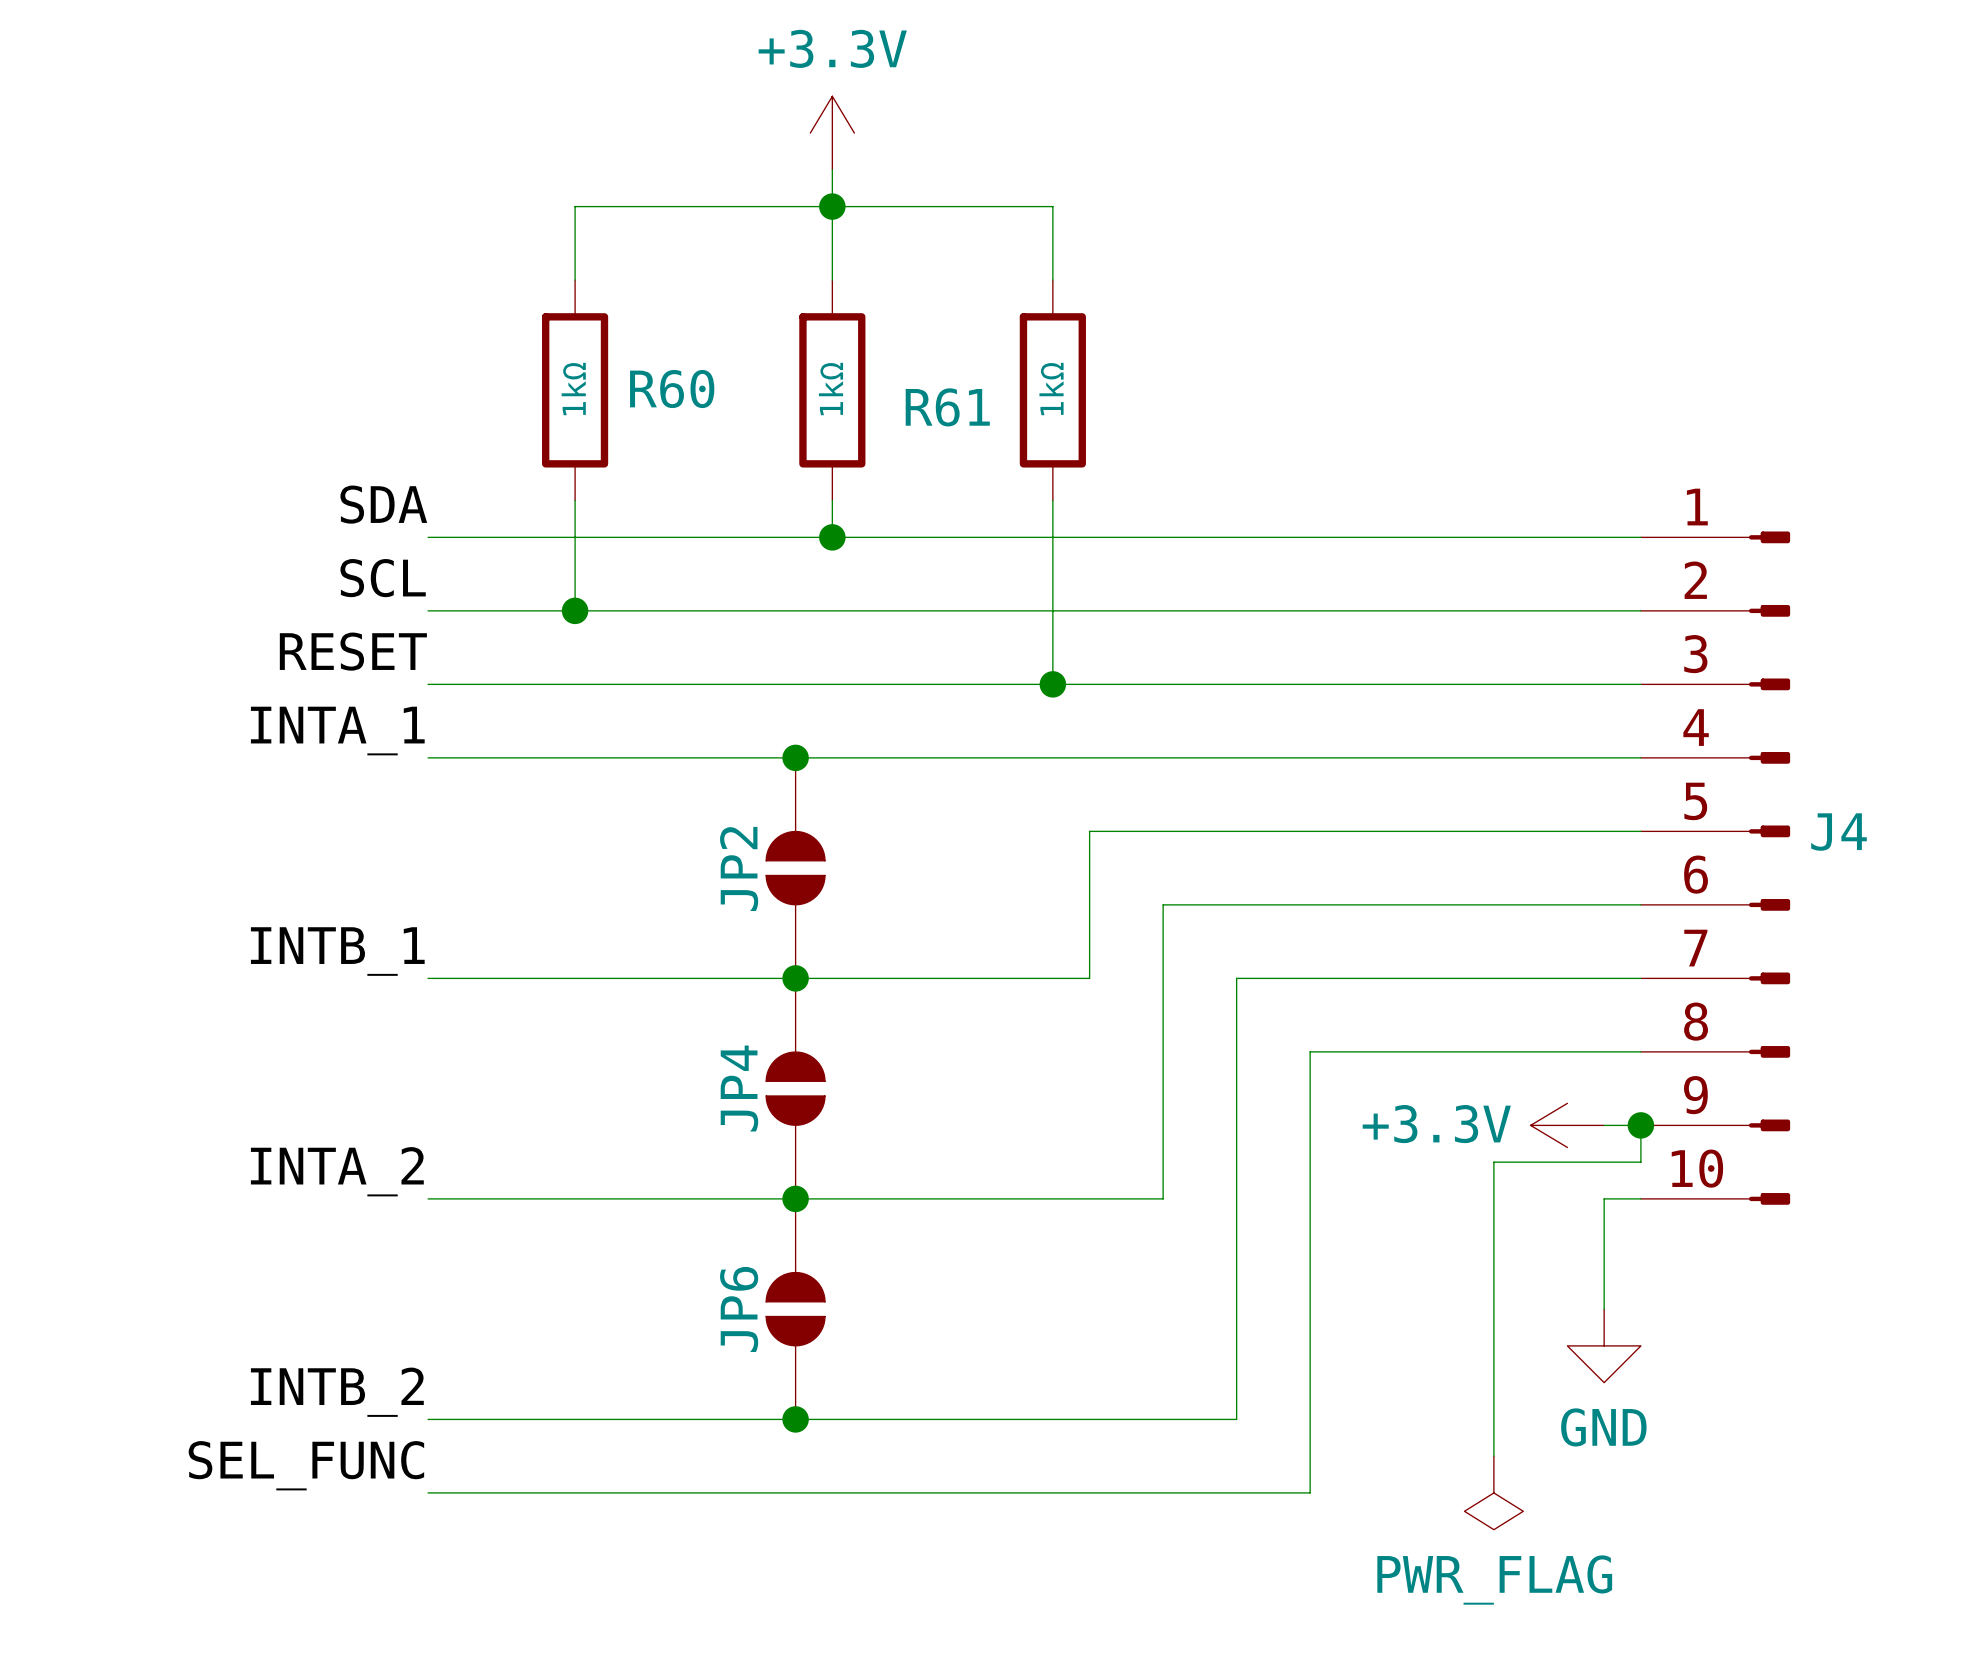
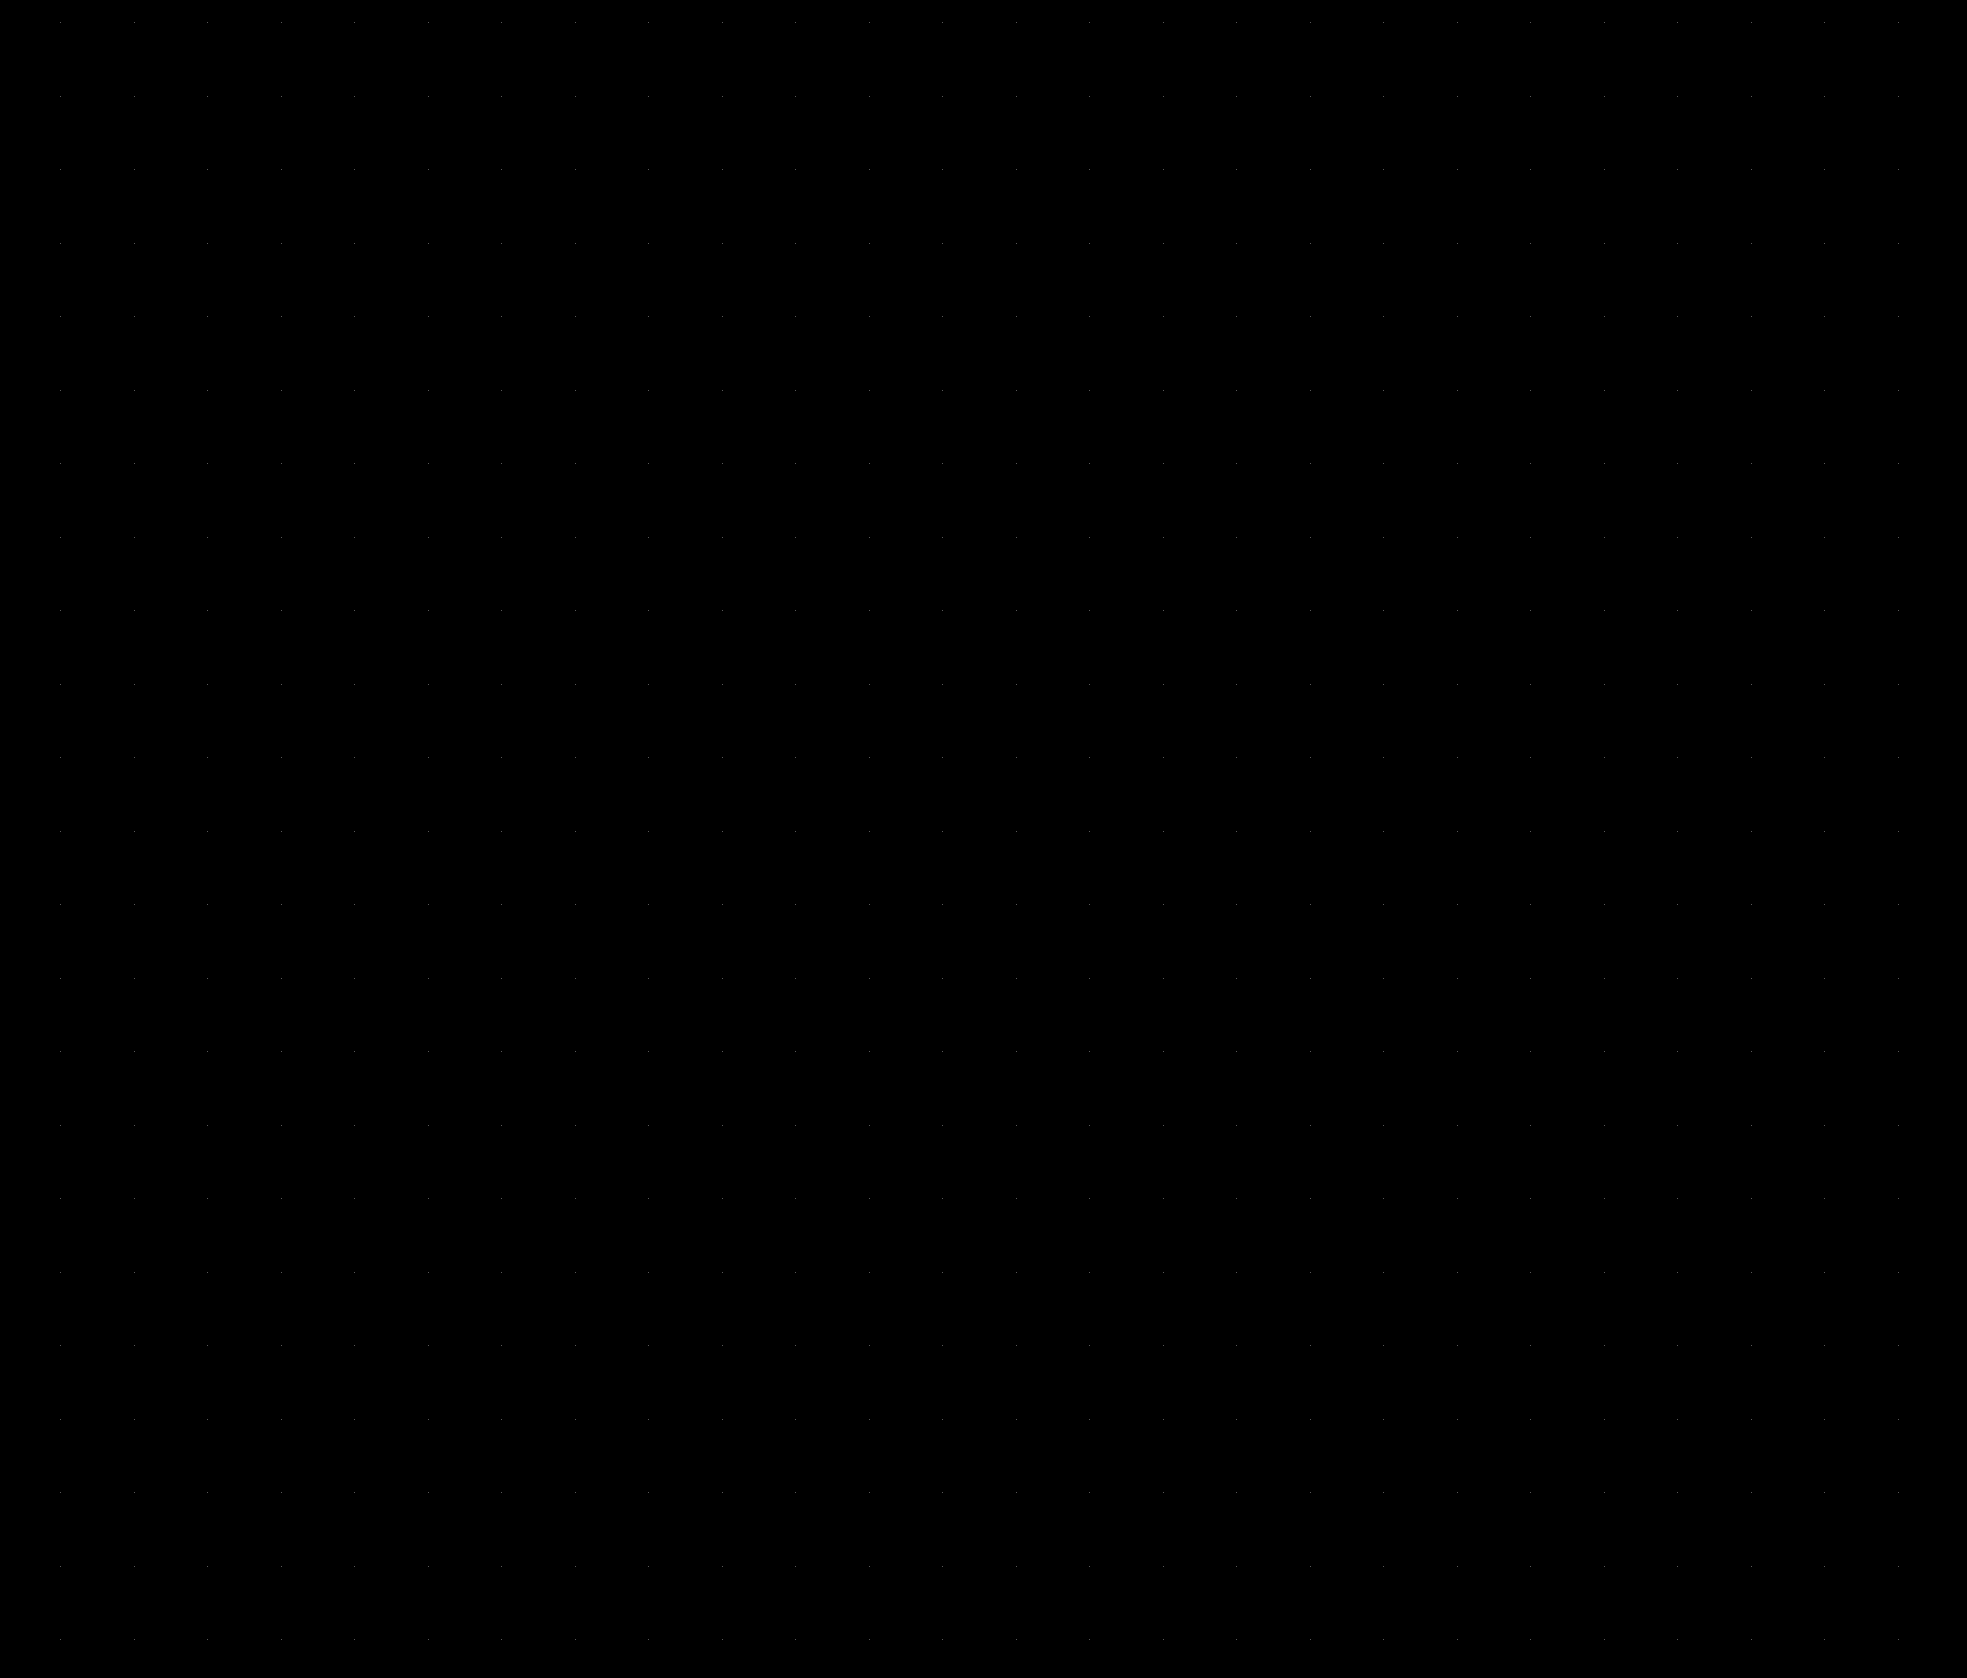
power symbol: +3.3V (832, 133) -> none
wire: (832, 169) (832, 280) -> none
junction: (832, 206) -> none
wire: (575, 280) (575, 206) (1052, 206) (1052, 280) -> none
R60: 1kΩ (575, 390) -> none
R61: 1kΩ (832, 390) -> none
part: 1kΩ (1052, 390) -> none
wire: (575, 500) (575, 610) -> none
wire: (832, 500) (832, 537) -> none
wire: (1052, 500) (1052, 684) -> none
label: SDA (383, 504) -> none
wire: (428, 537) (1640, 537) -> none
junction: (832, 537) -> none
label: SCL (383, 578) -> none
wire: (428, 610) (1640, 610) -> none
junction: (575, 610) -> none
label: RESET (353, 651) -> none
wire: (428, 684) (1640, 684) -> none
junction: (1052, 684) -> none
label: INTA_1 (337, 731) -> none
wire: (428, 757) (1640, 757) -> none
junction: (795, 757) -> none
wire: (1640, 831) (1089, 831) (1089, 978) (428, 978) -> none
JP2: (795, 868) -> none
J4: (1715, 868) -> none
wire: (1640, 904) (1163, 904) (1163, 1198) (428, 1198) -> none
label: INTB_1 (337, 951) -> none
junction: (795, 978) -> none
wire: (1640, 978) (1236, 978) (1236, 1419) (428, 1419) -> none
wire: (1640, 1051) (1310, 1051) (1310, 1492) (428, 1492) -> none
JP4: (795, 1088) -> none
power symbol: +3.3V (1567, 1125) -> none
wire: (1604, 1125) (1640, 1125) (1640, 1162) (1493, 1162) (1493, 1456) -> none
junction: (1640, 1125) -> none
label: INTA_2 (337, 1171) -> none
junction: (795, 1198) -> none
wire: (1640, 1198) (1604, 1198) (1604, 1309) -> none
JP6: (795, 1309) -> none
power symbol: GND (1604, 1345) -> none
label: INTB_2 (337, 1392) -> none
junction: (795, 1419) -> none
label: SEL_FUNC (306, 1465) -> none
power symbol: PWR_FLAG (1493, 1492) -> none

